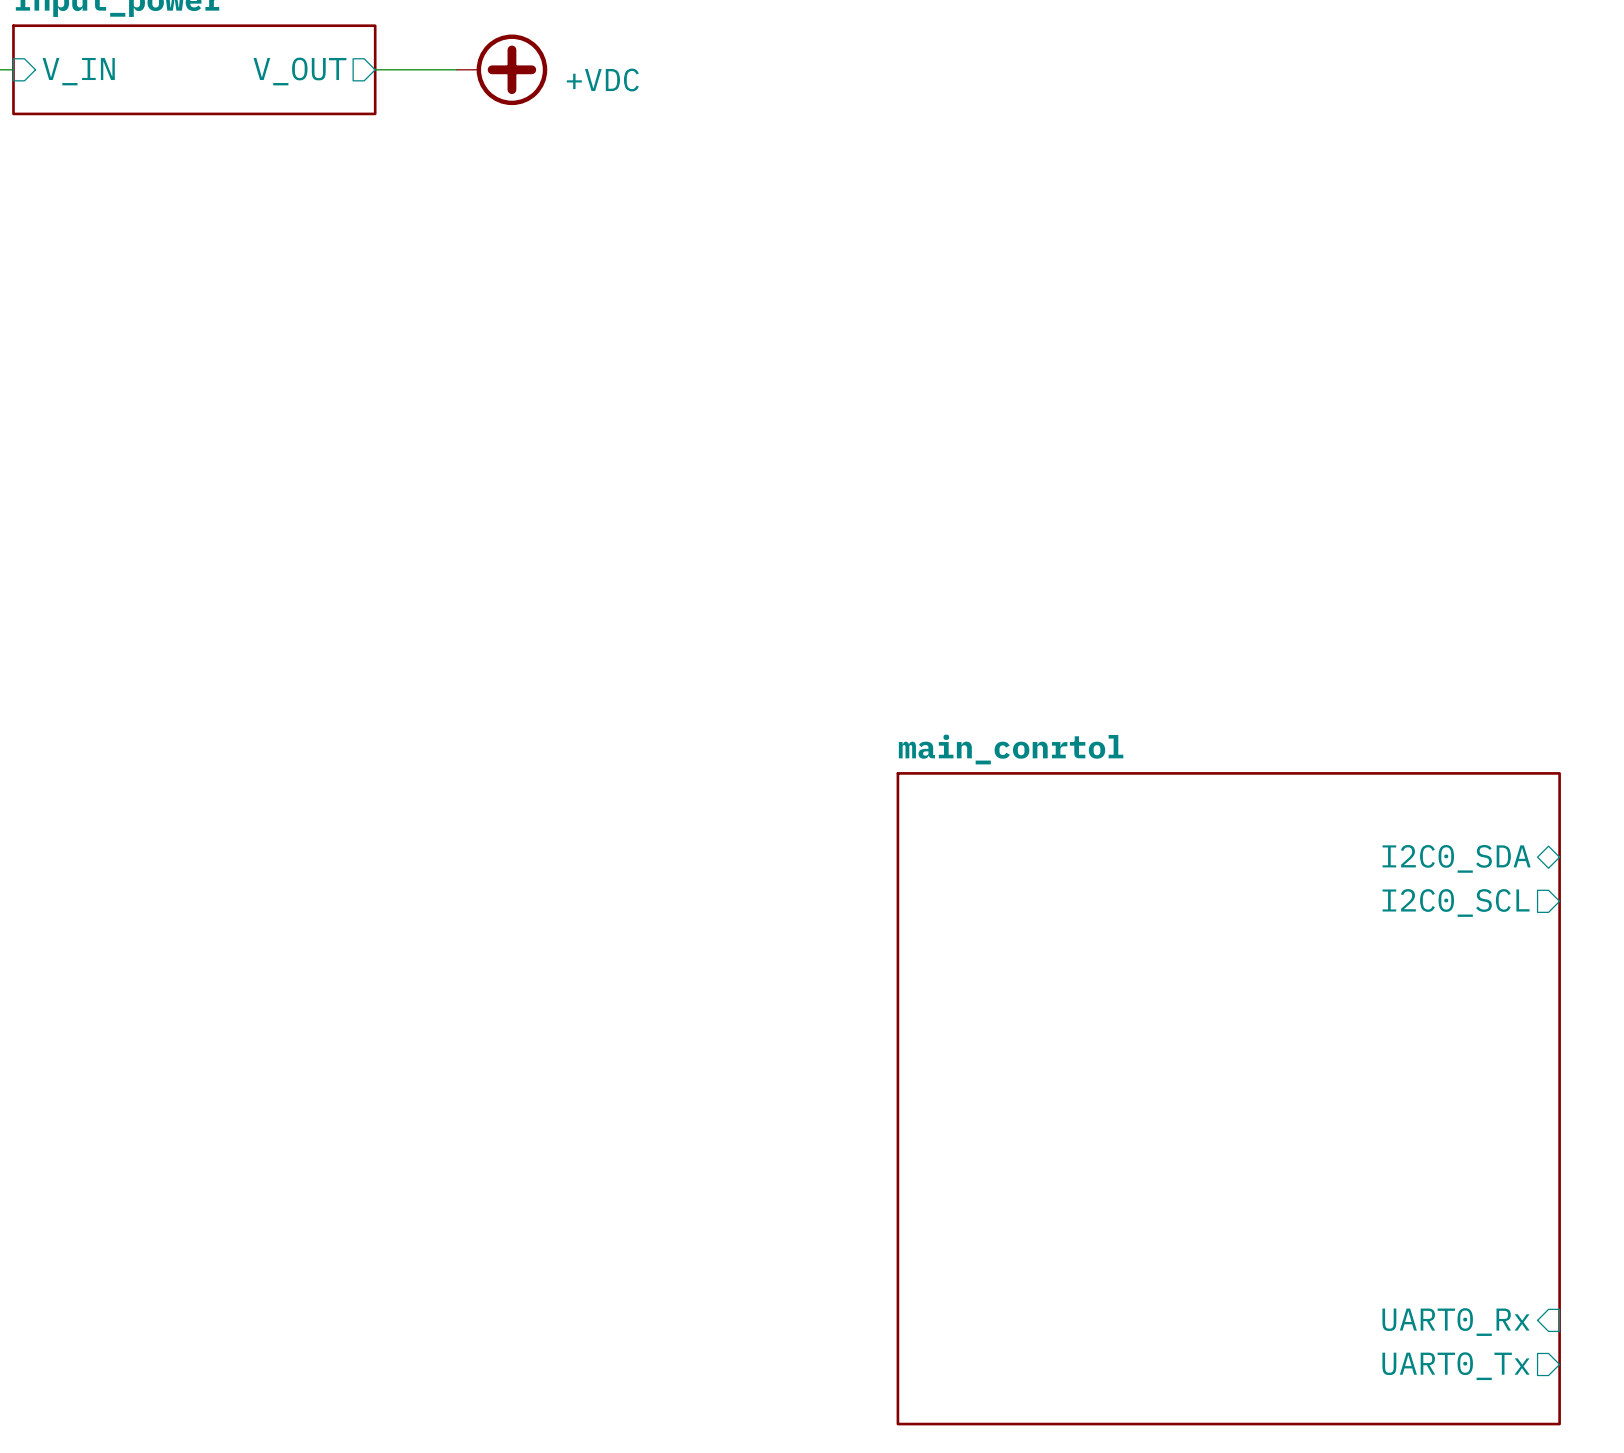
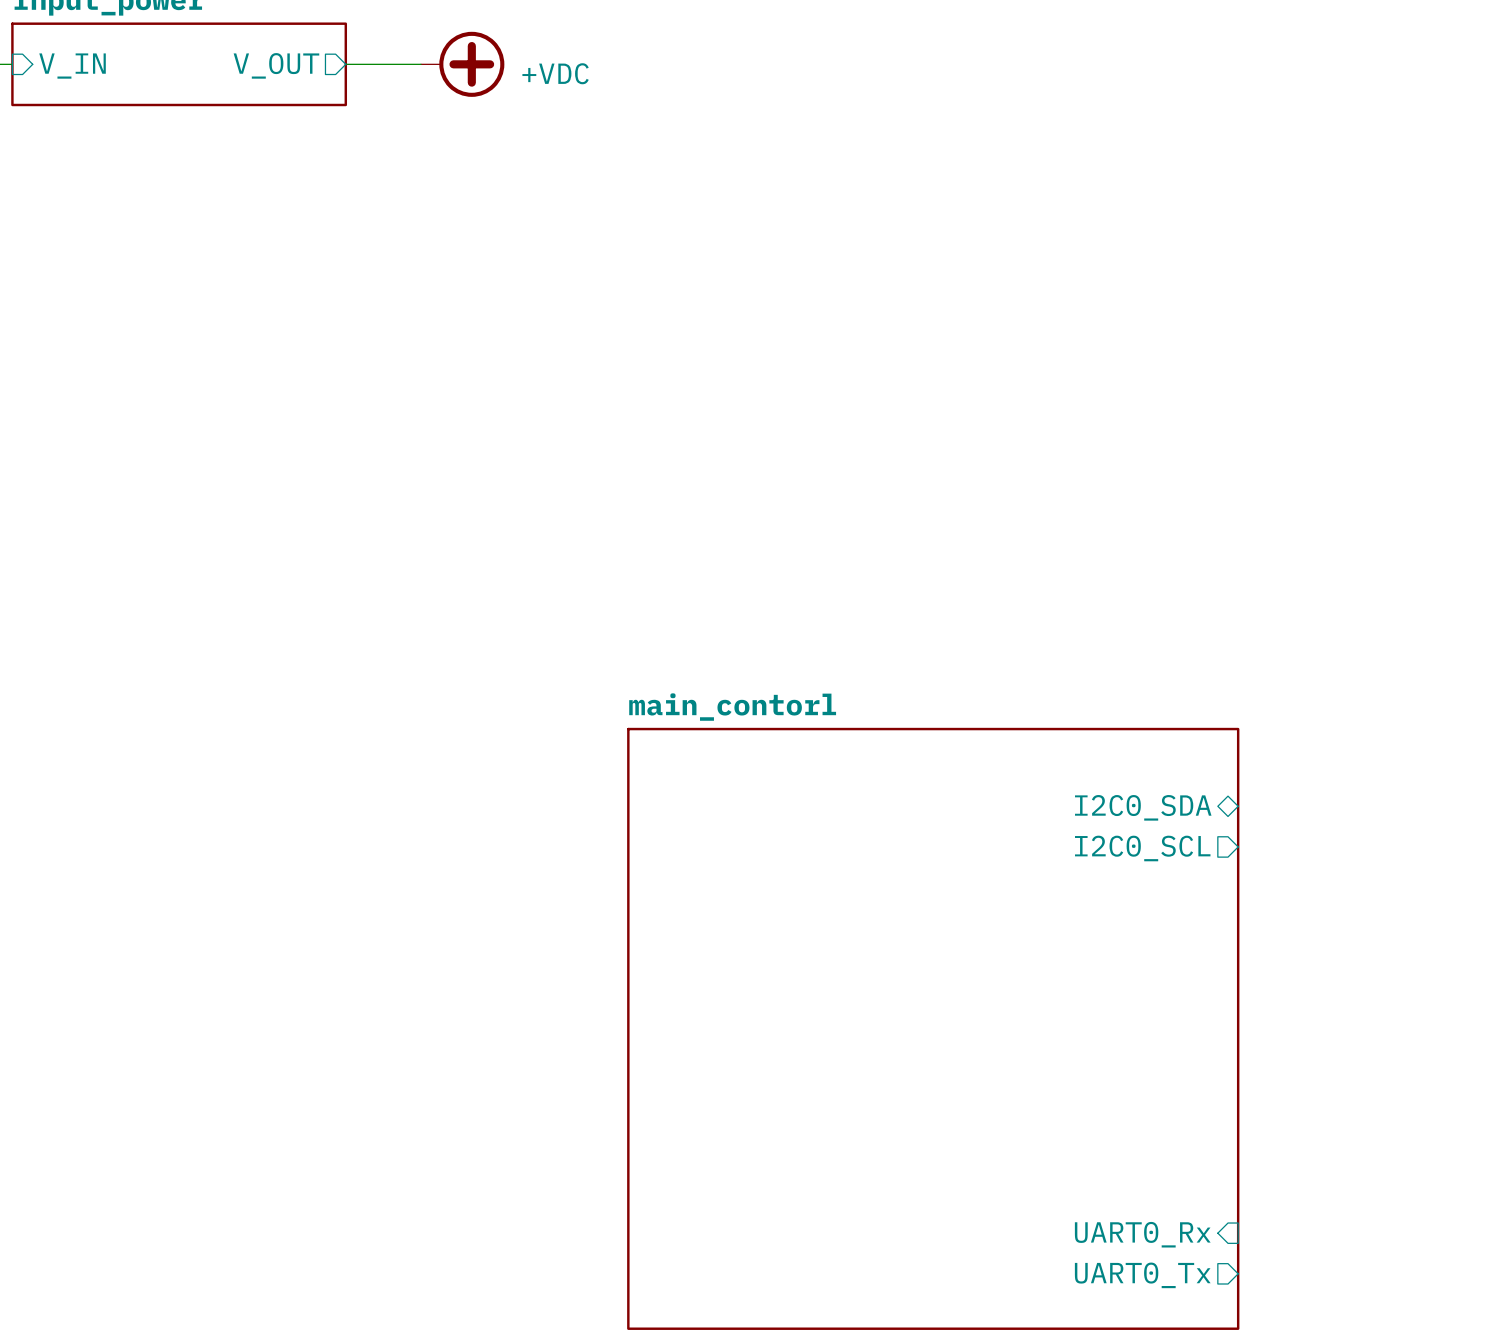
sheet pin position: I2C0_SDA (1456, 858) -> I2C0_SDA (1143, 807)
sheet pin position: I2C0_SCL (1456, 902) -> I2C0_SCL (1142, 848)
sheet main_conrtol: (1228, 1098) -> none
sheet main_contorl: none -> (933, 1028)
sheet pin position: UART0_Rx (1456, 1322) -> UART0_Rx (1142, 1234)
sheet pin position: UART0_Tx (1456, 1366) -> UART0_Tx (1142, 1275)

